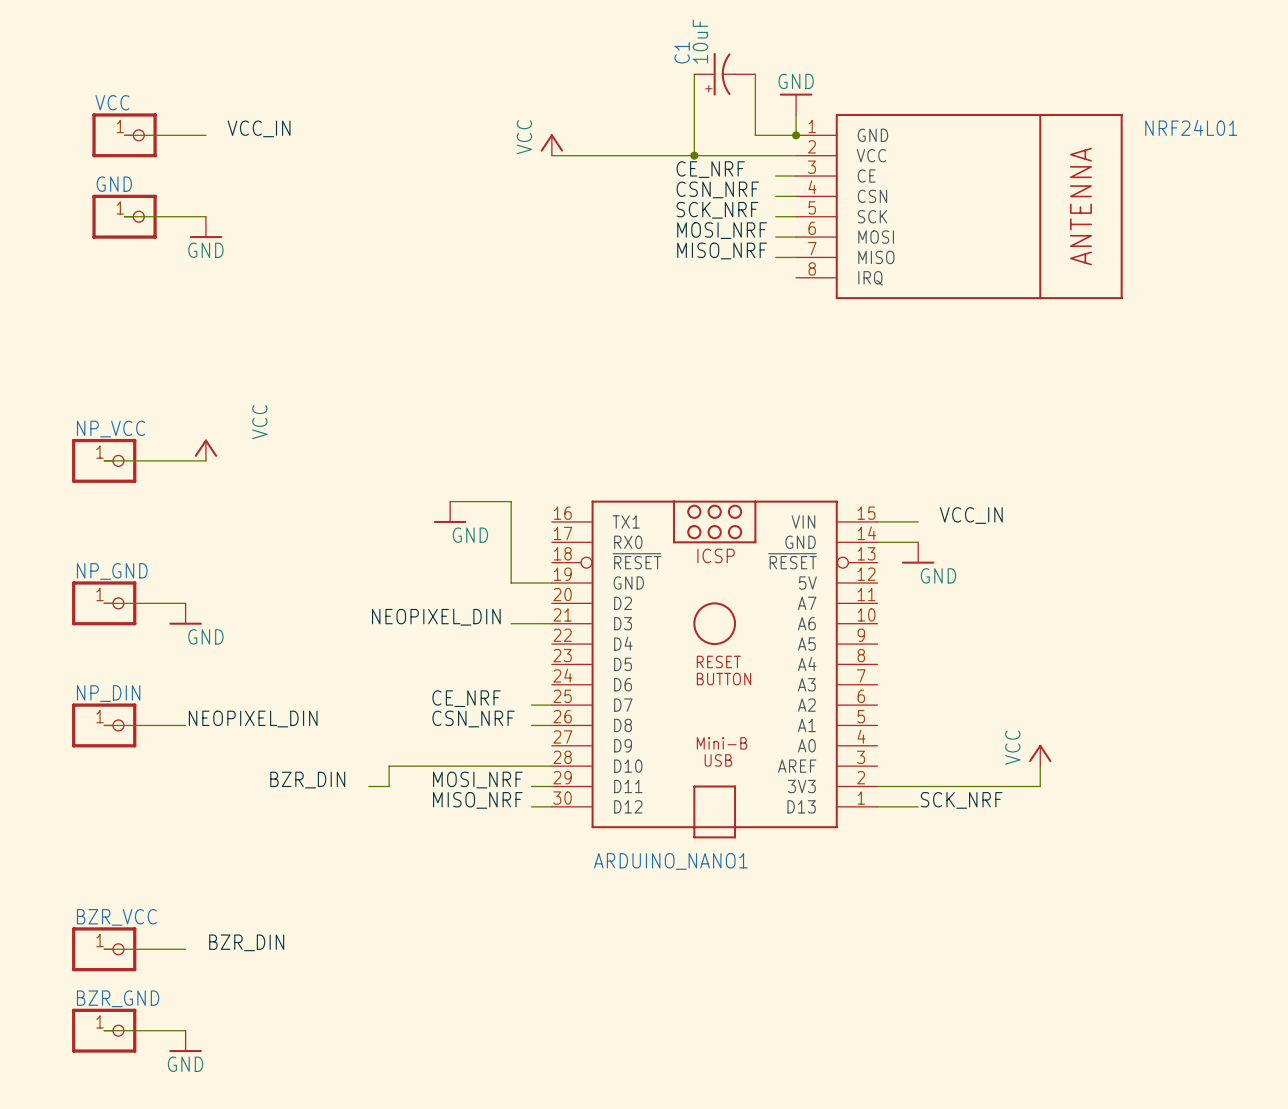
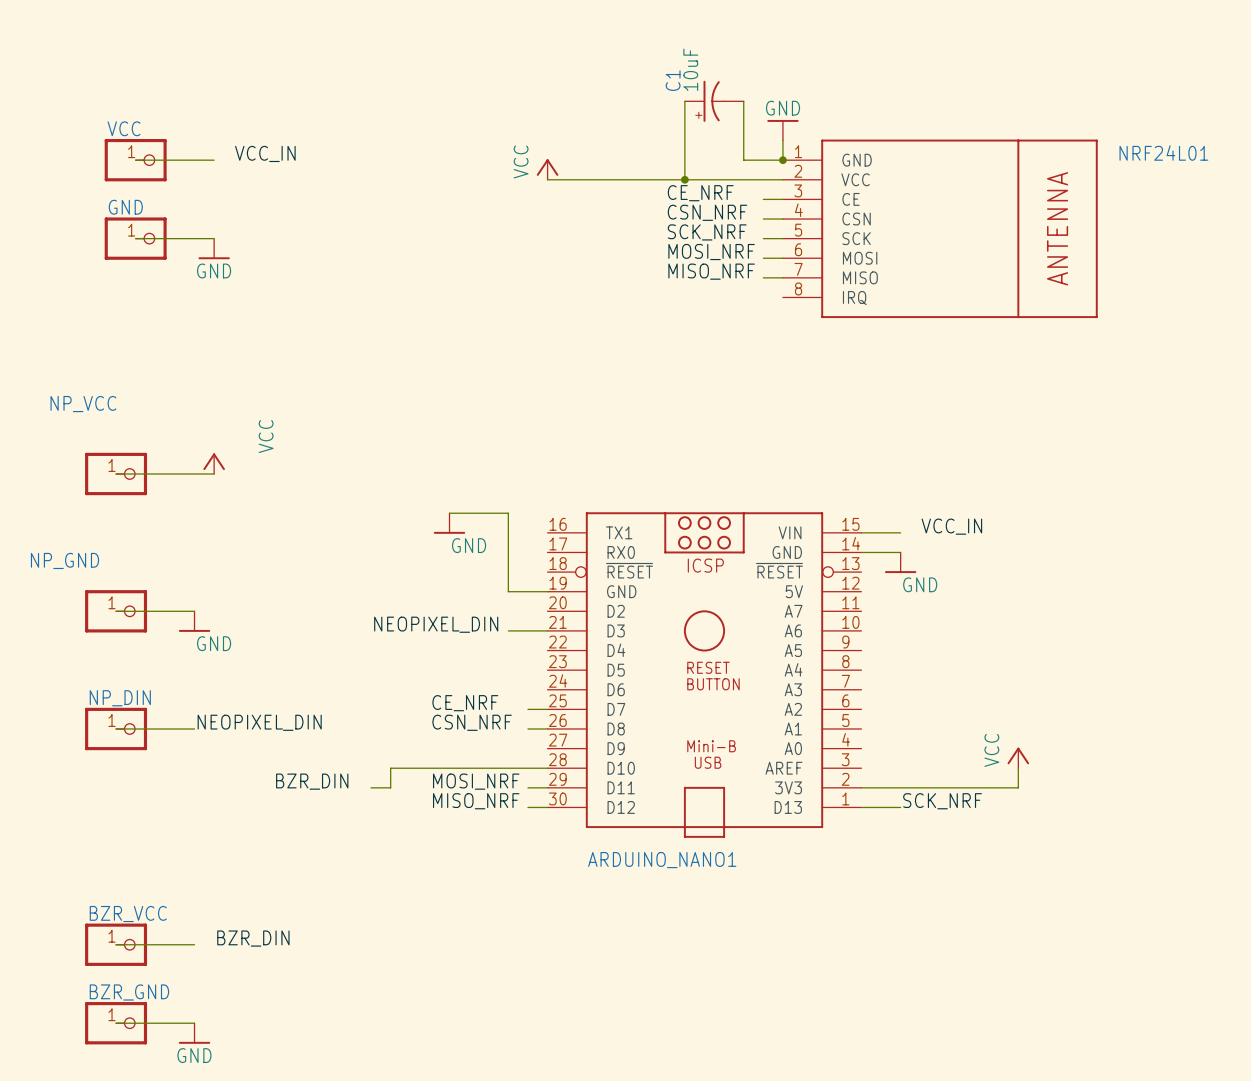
NP_VCC name position: NP_VCC (111, 429) -> NP_VCC (83, 404)
NP_GND name position: NP_GND (112, 571) -> NP_GND (65, 560)

